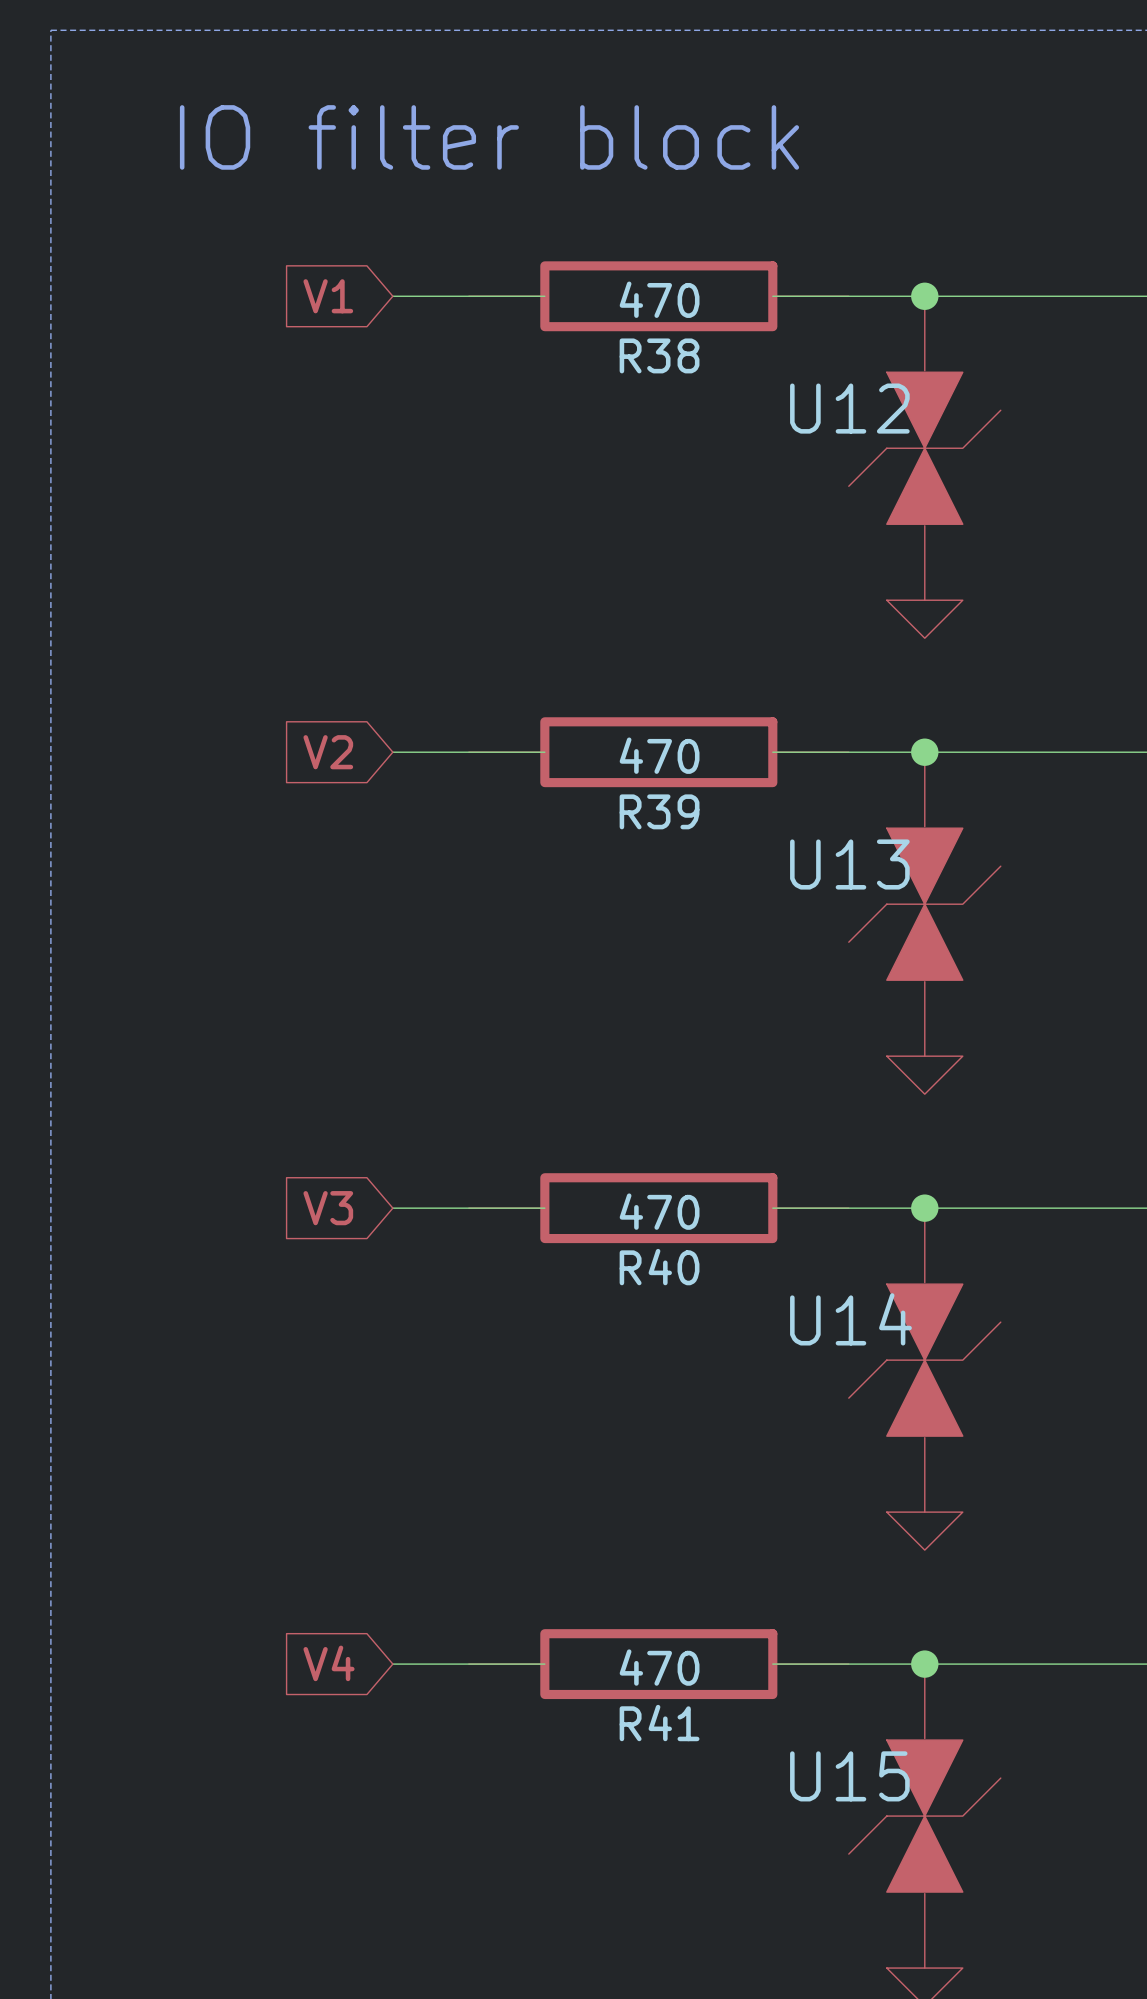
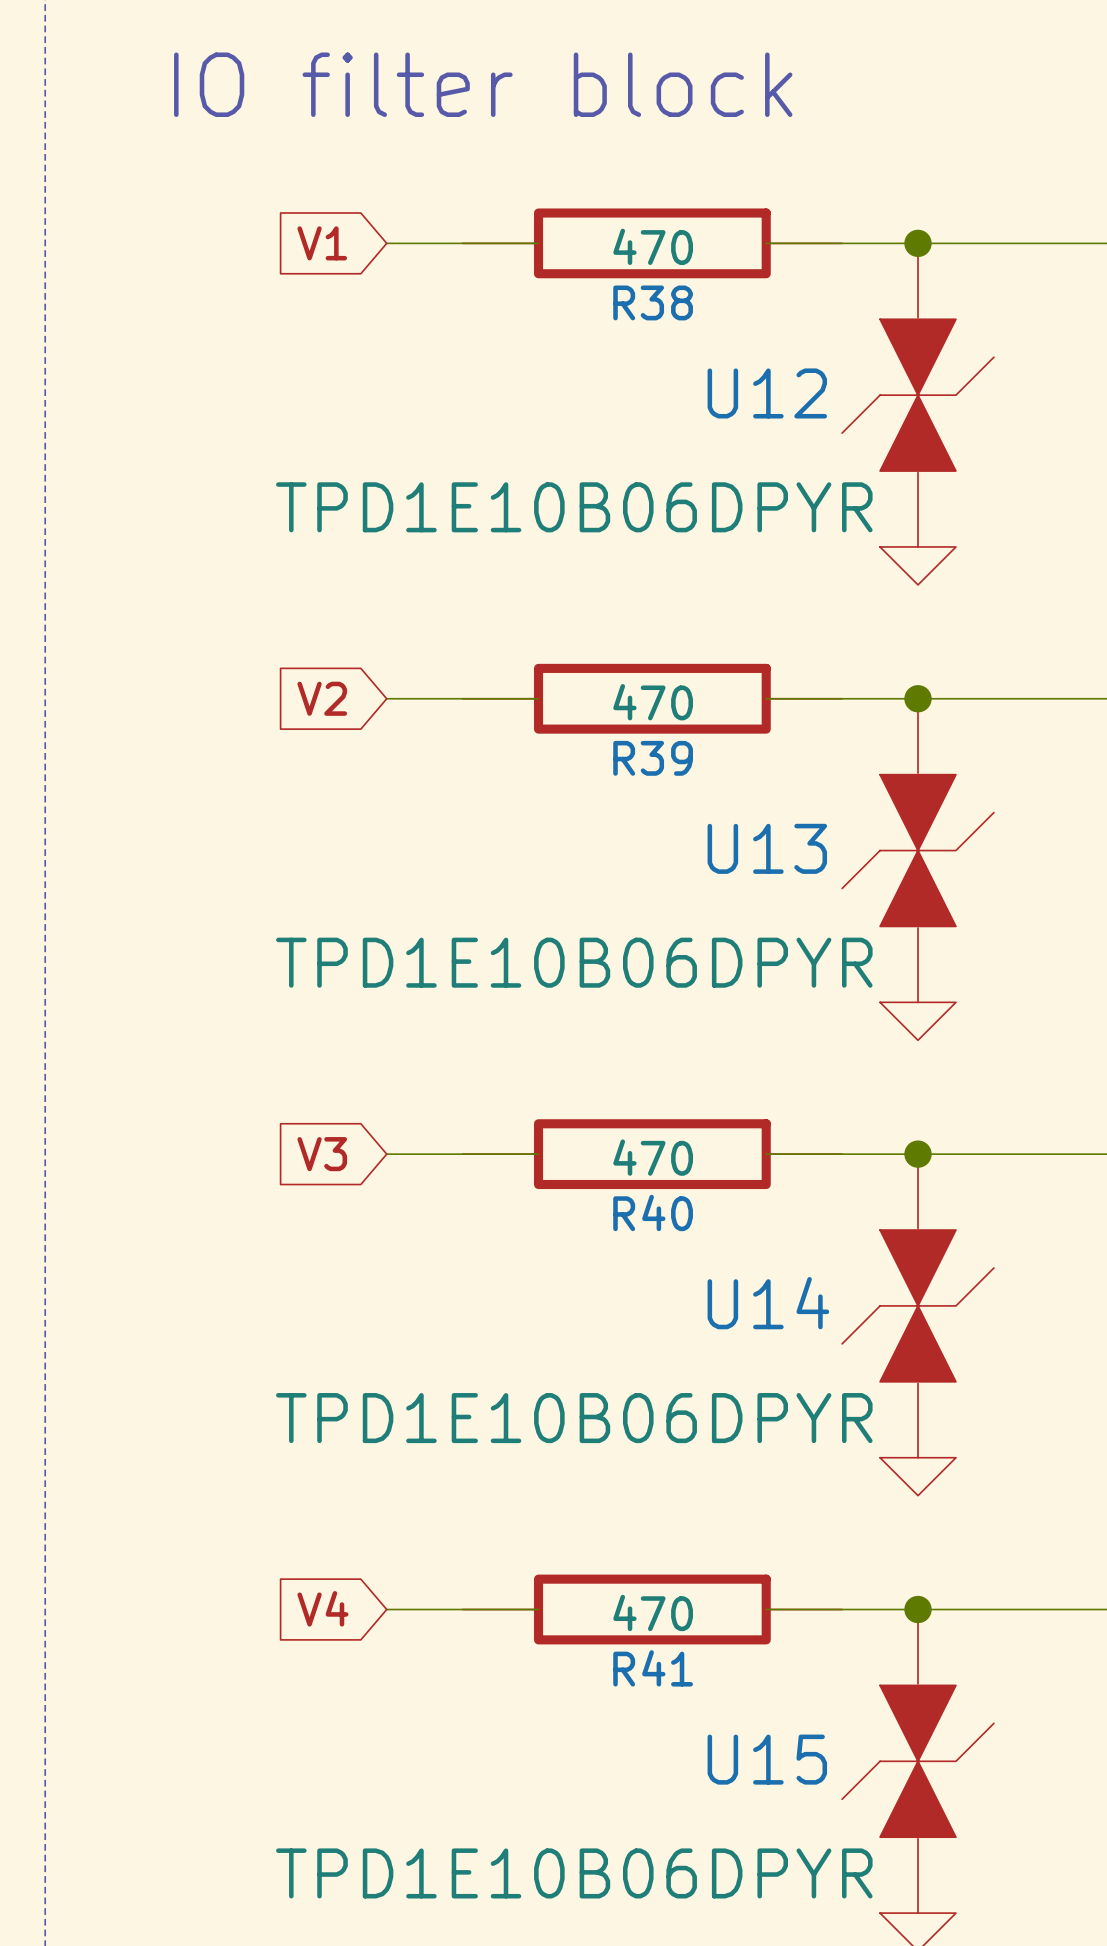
U12 name position: U12 (849, 408) -> U12 (767, 393)
U12 value: none -> TPD1E10B06DPYR (574, 507)
U13 name position: U13 (849, 864) -> U13 (767, 848)
U13 value: none -> TPD1E10B06DPYR (574, 962)
U14 name position: U14 (850, 1319) -> U14 (768, 1303)
U14 value: none -> TPD1E10B06DPYR (574, 1418)
U15 name position: U15 (849, 1776) -> U15 (767, 1759)
U15 value: none -> TPD1E10B06DPYR (574, 1873)

